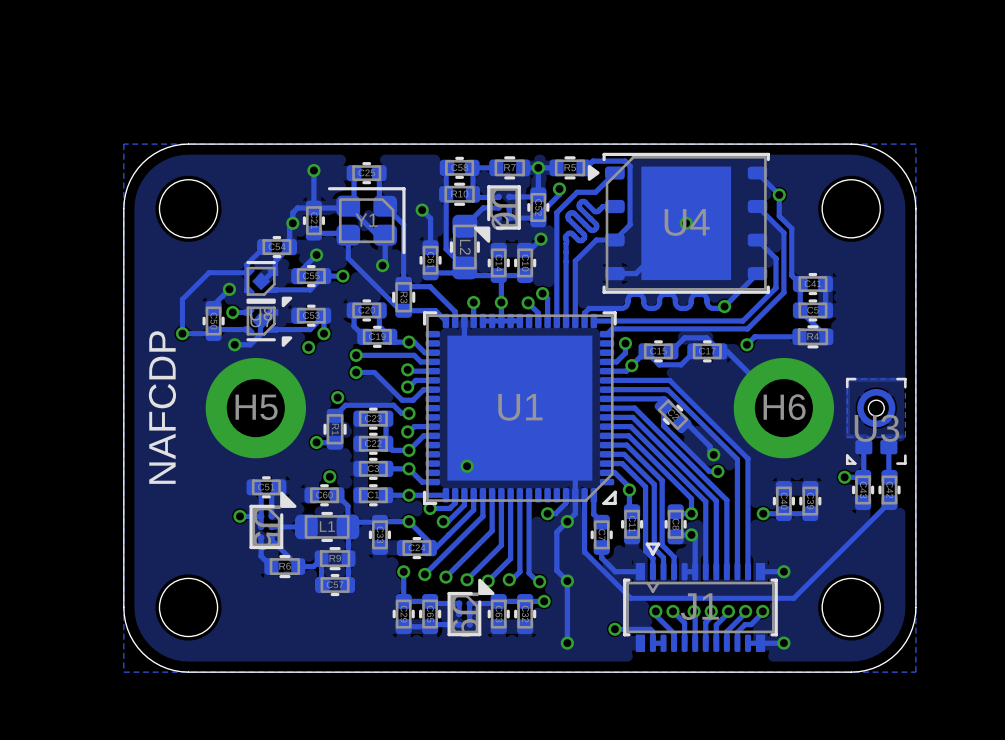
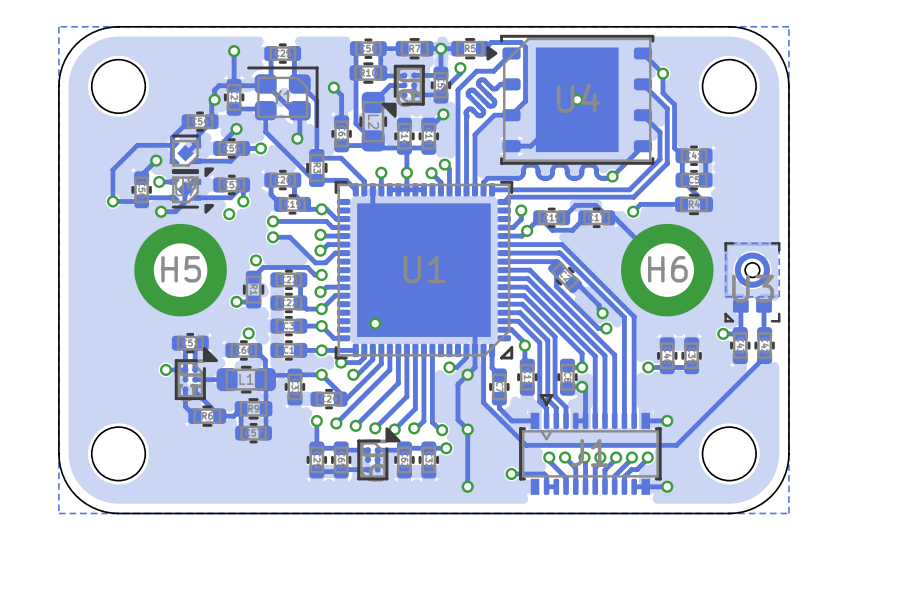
text: NAFCDP (162, 407) -> none

